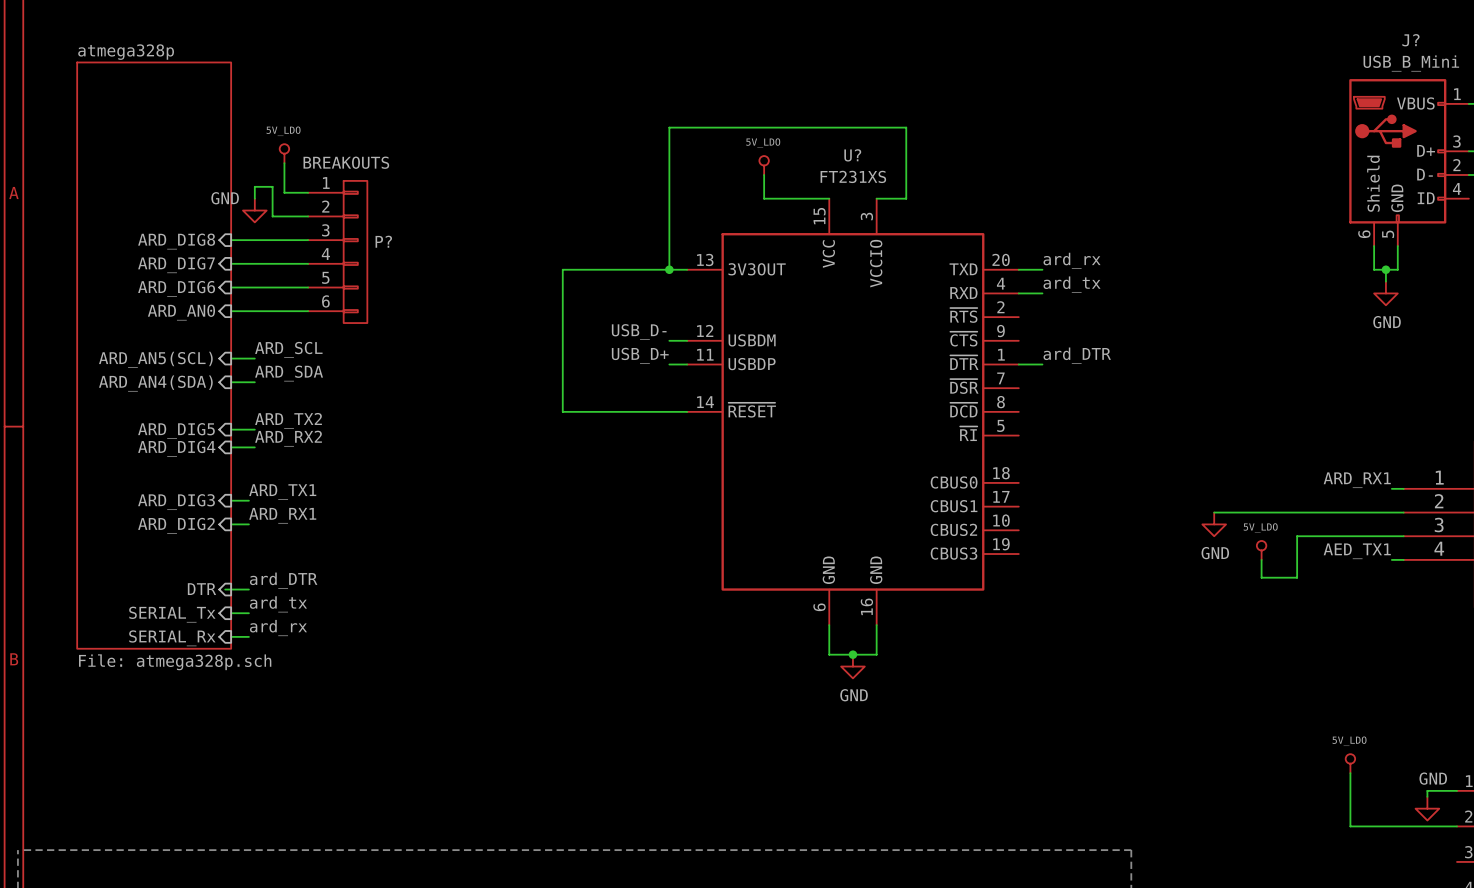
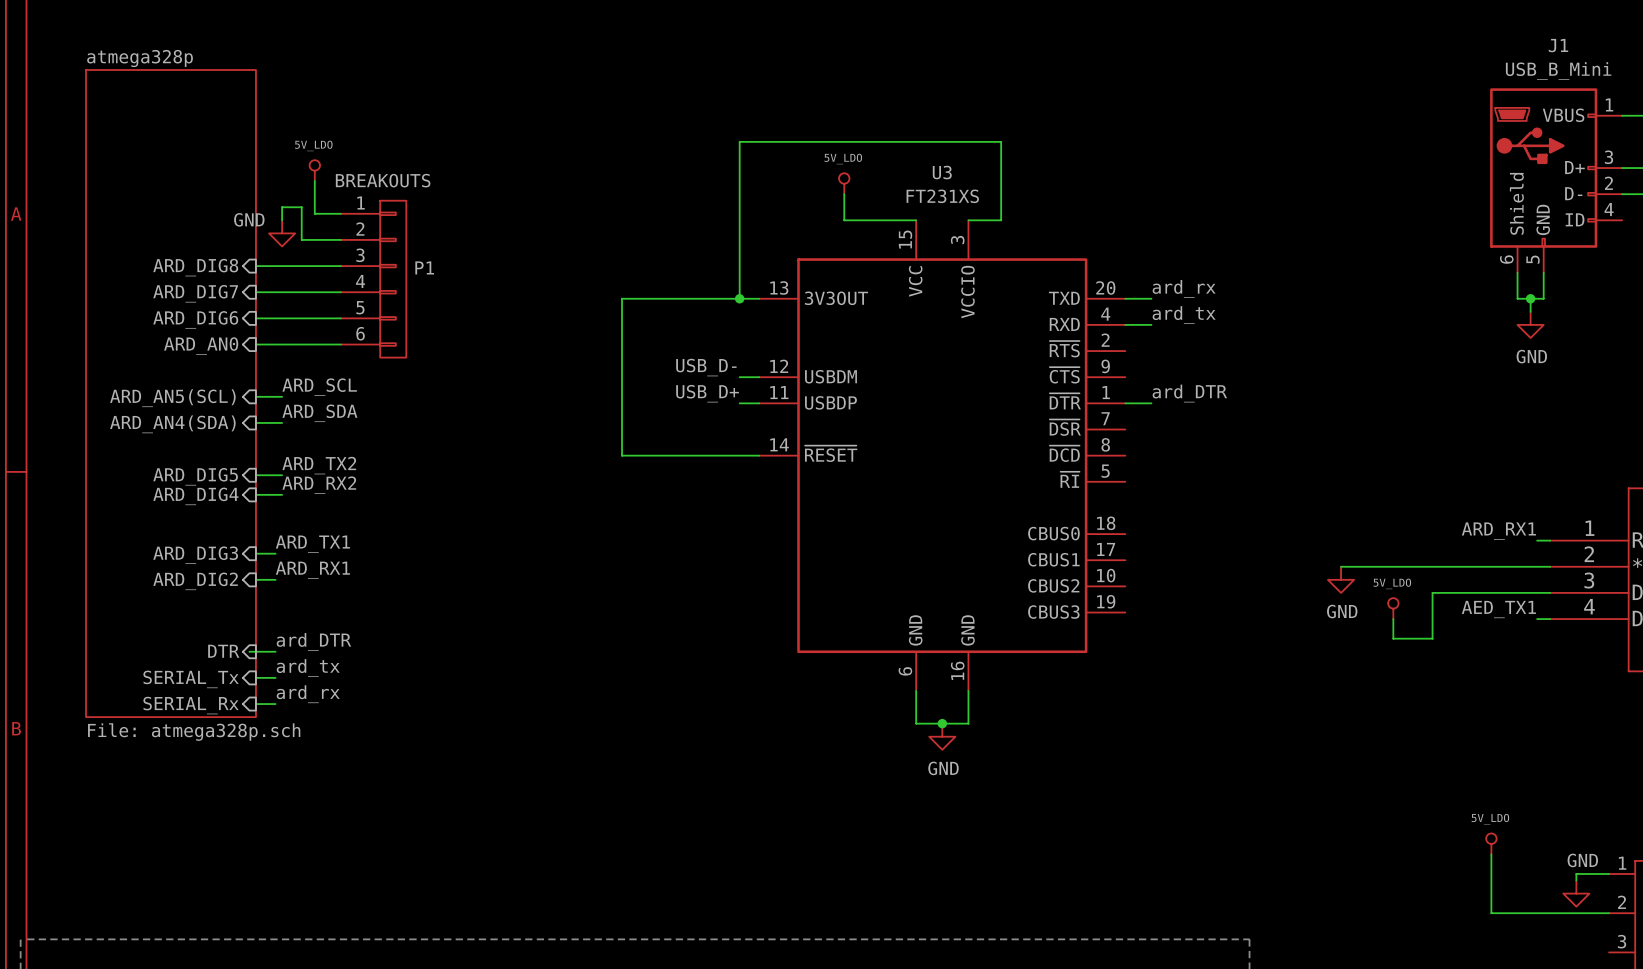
J? name: J? (1410, 40) -> J1 (1558, 45)
U? name: U? (852, 155) -> U3 (942, 172)
P? name: P? (383, 241) -> P1 (424, 267)

